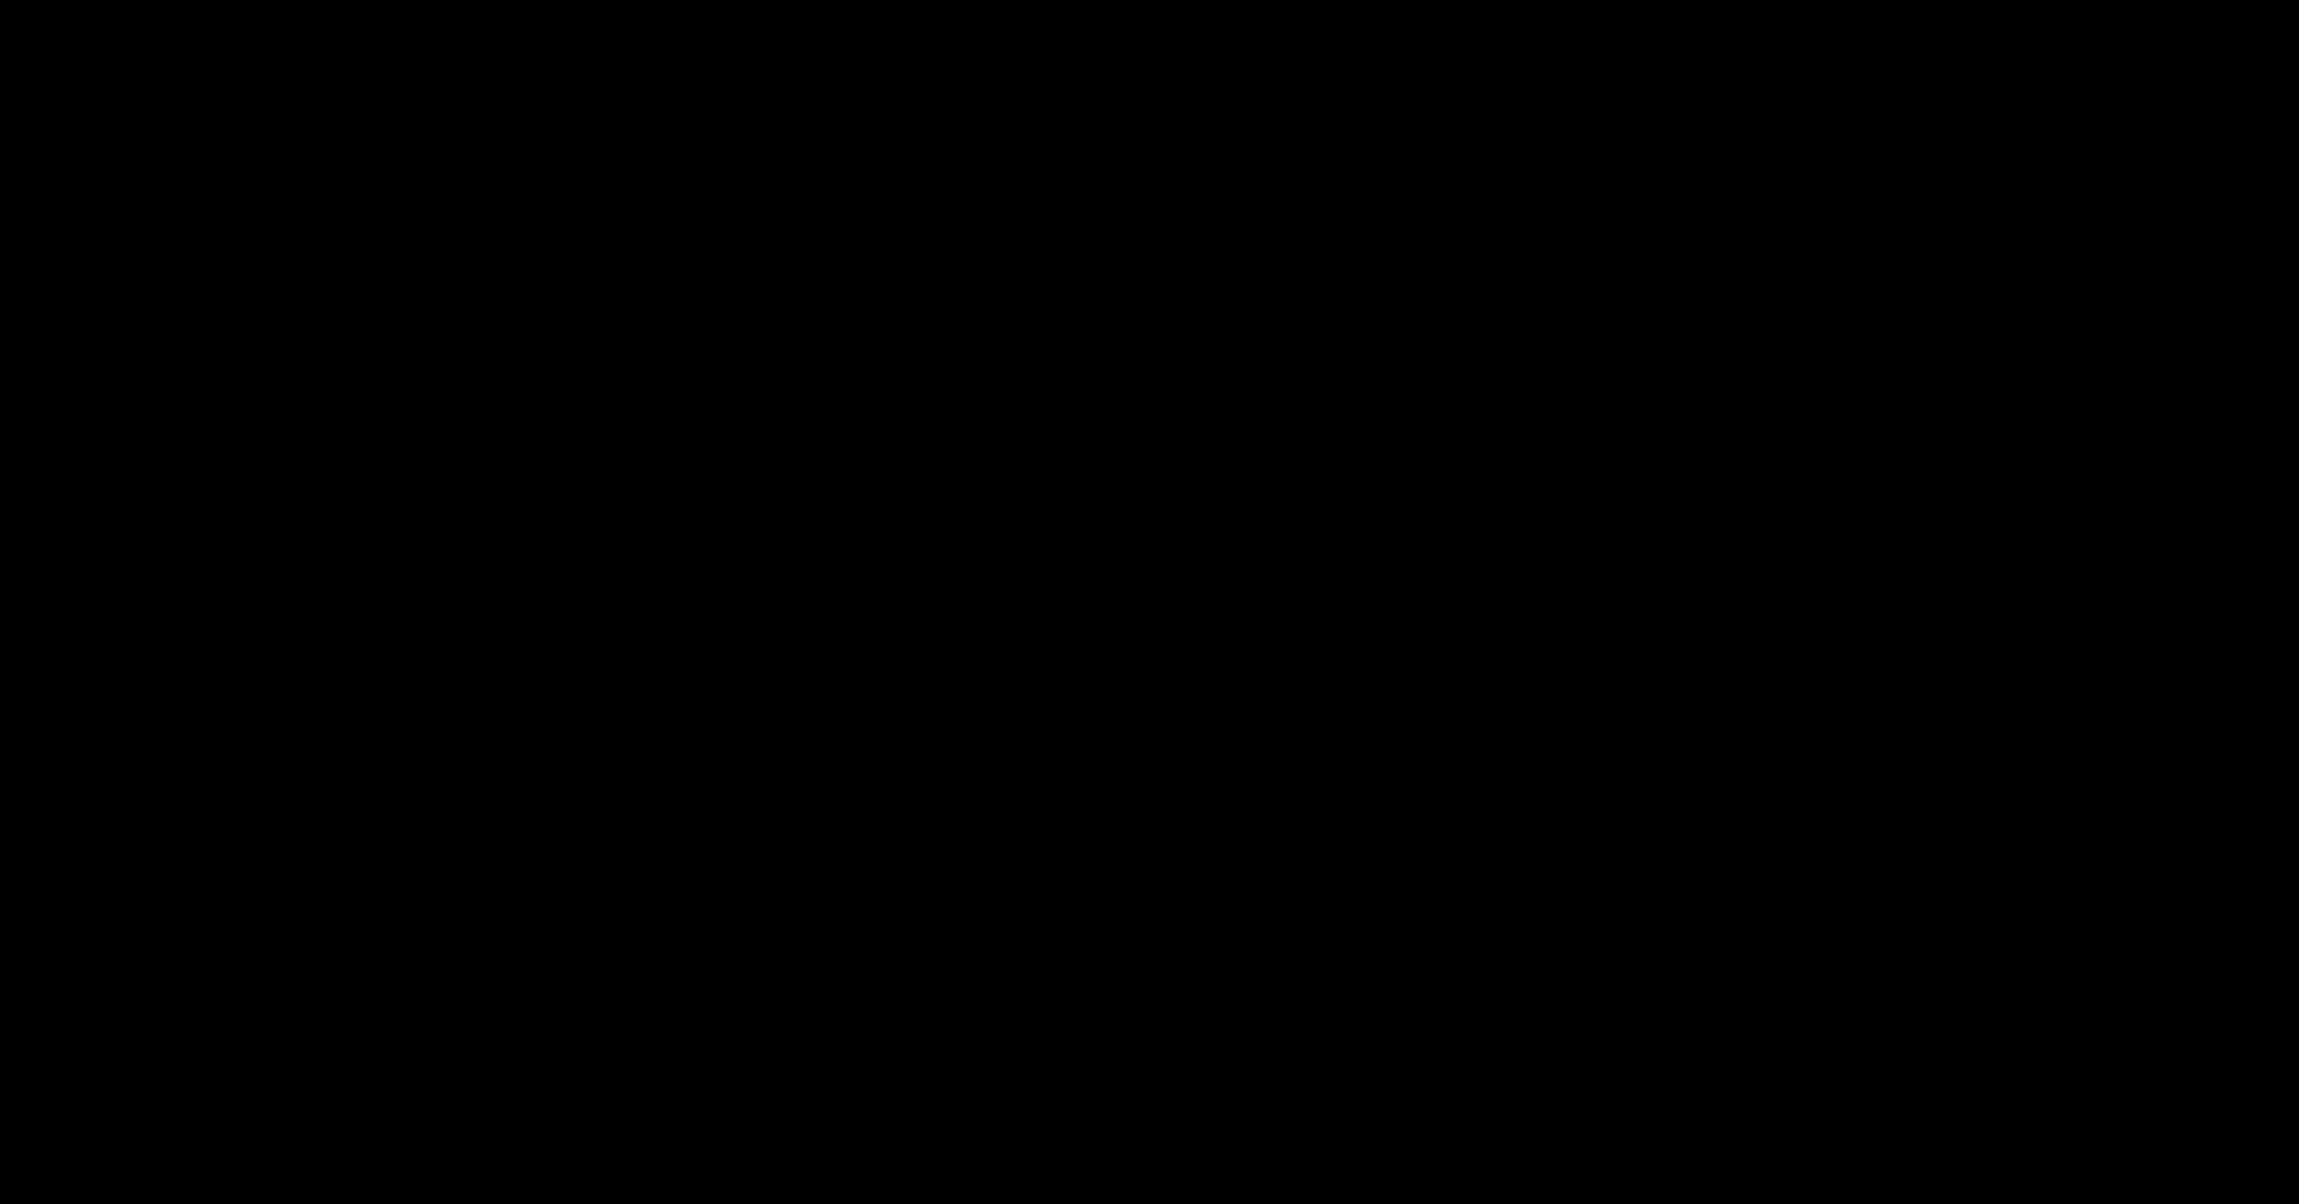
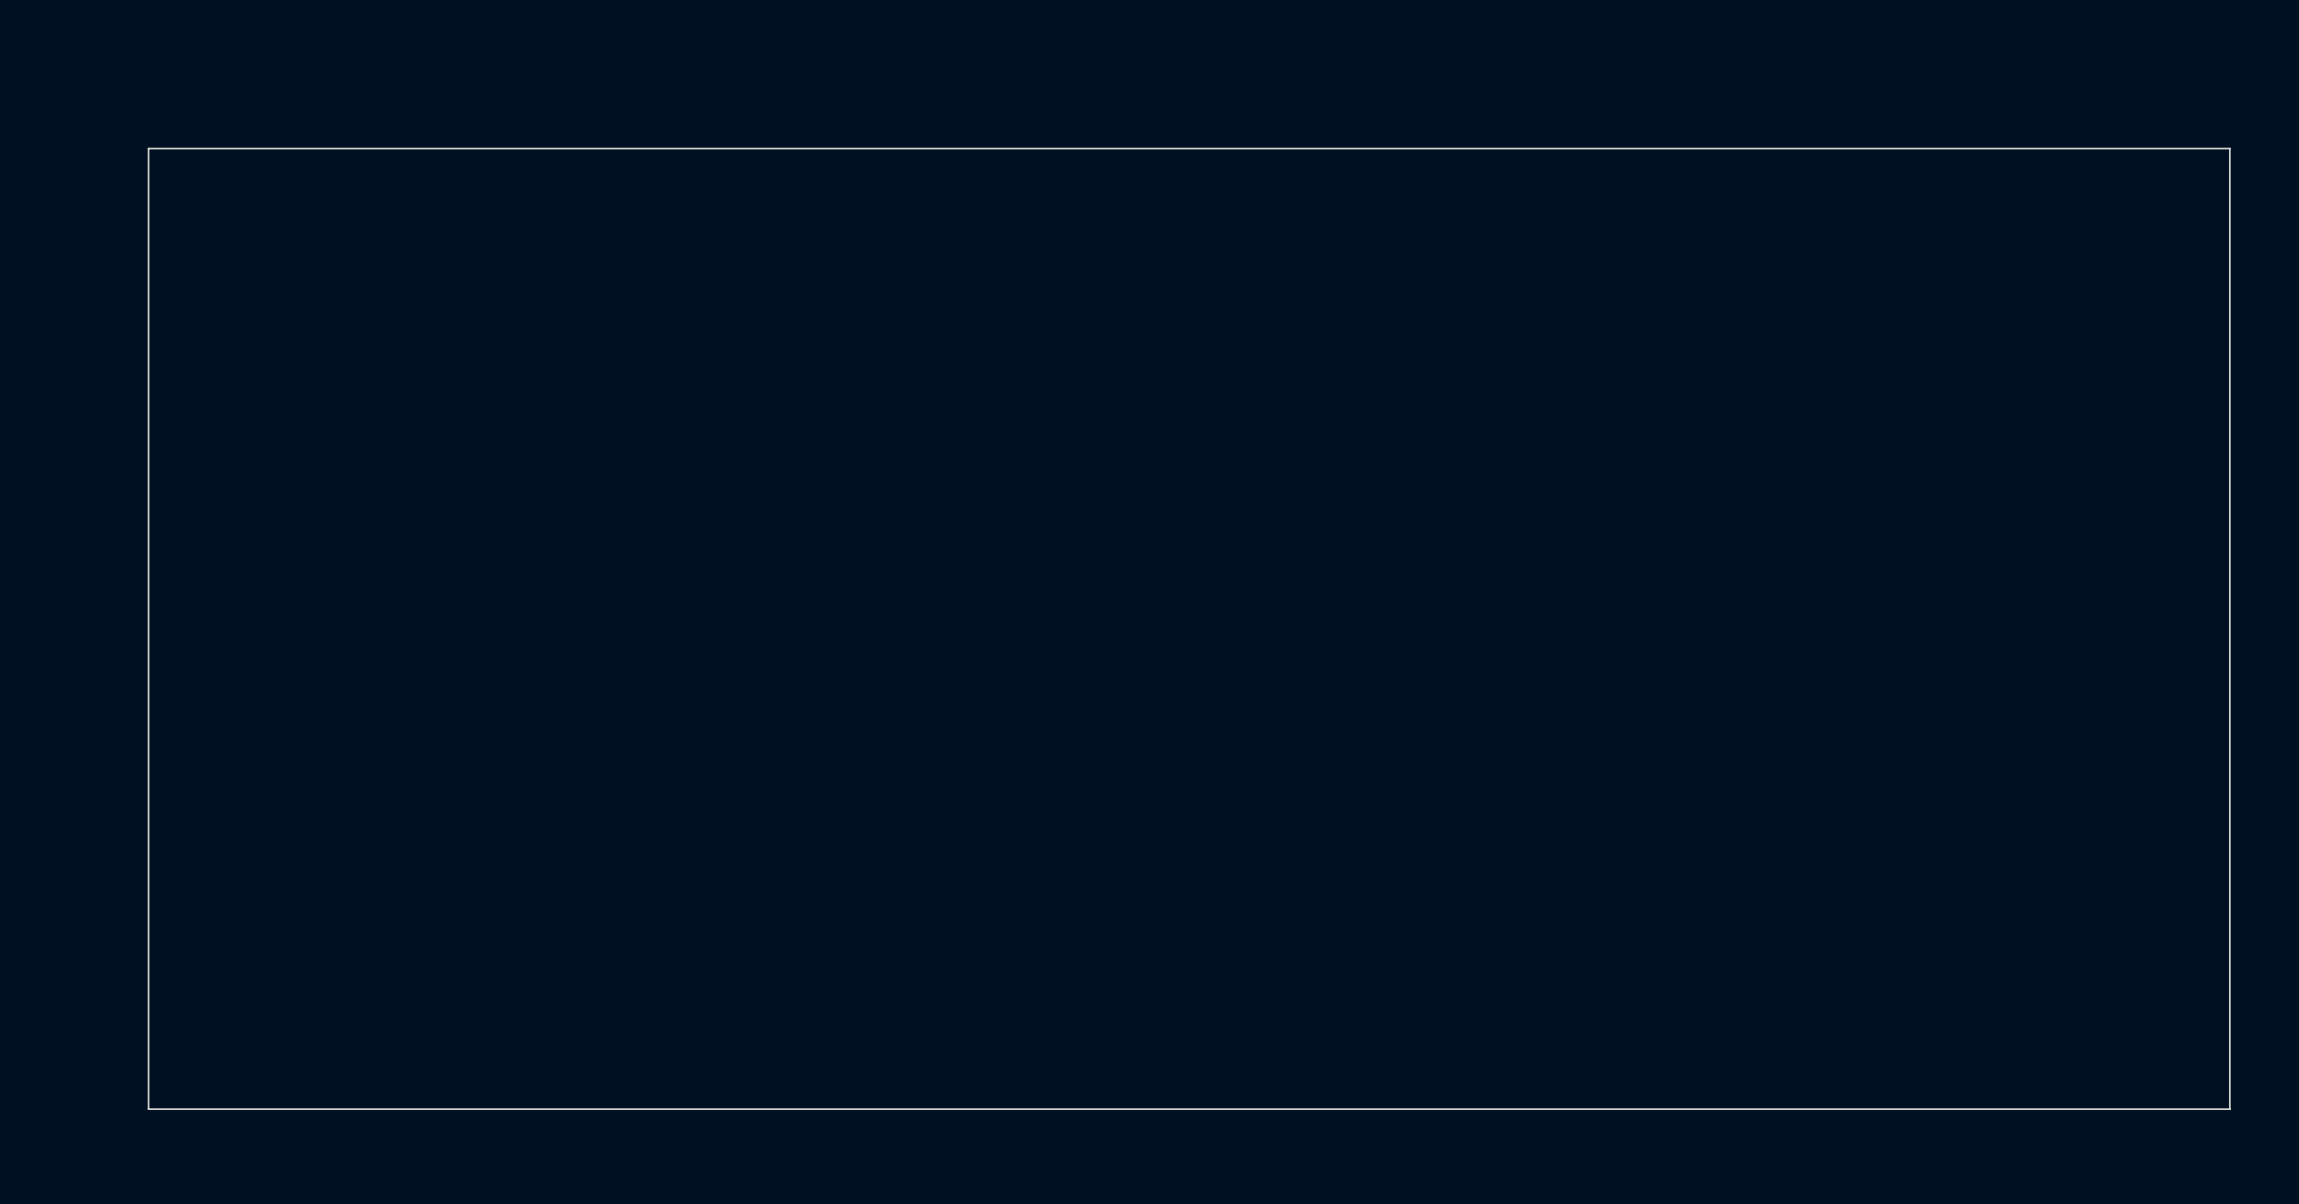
board edge: none -> (2229, 148) (148, 148) (148, 1109) (2229, 1109) (2229, 148)

